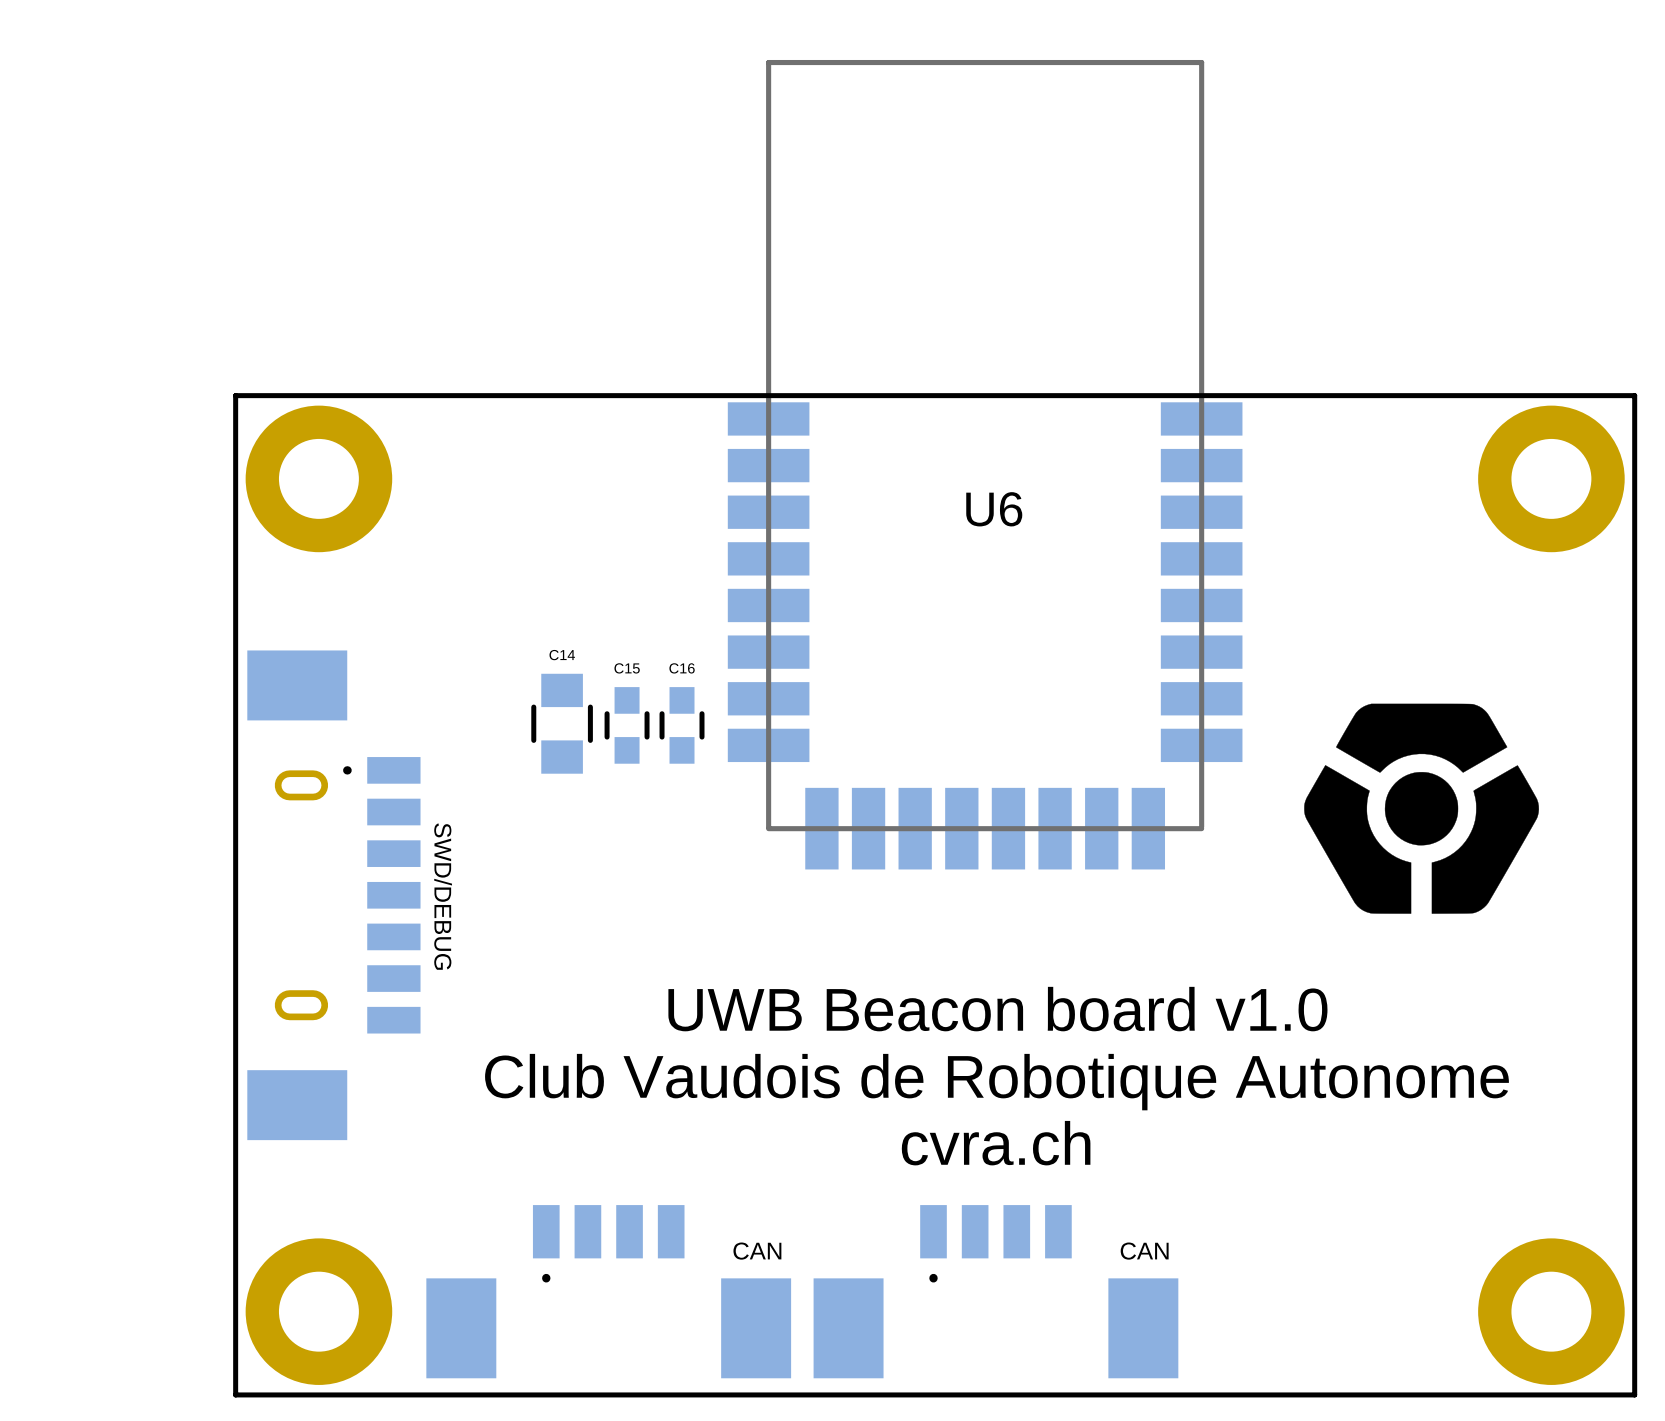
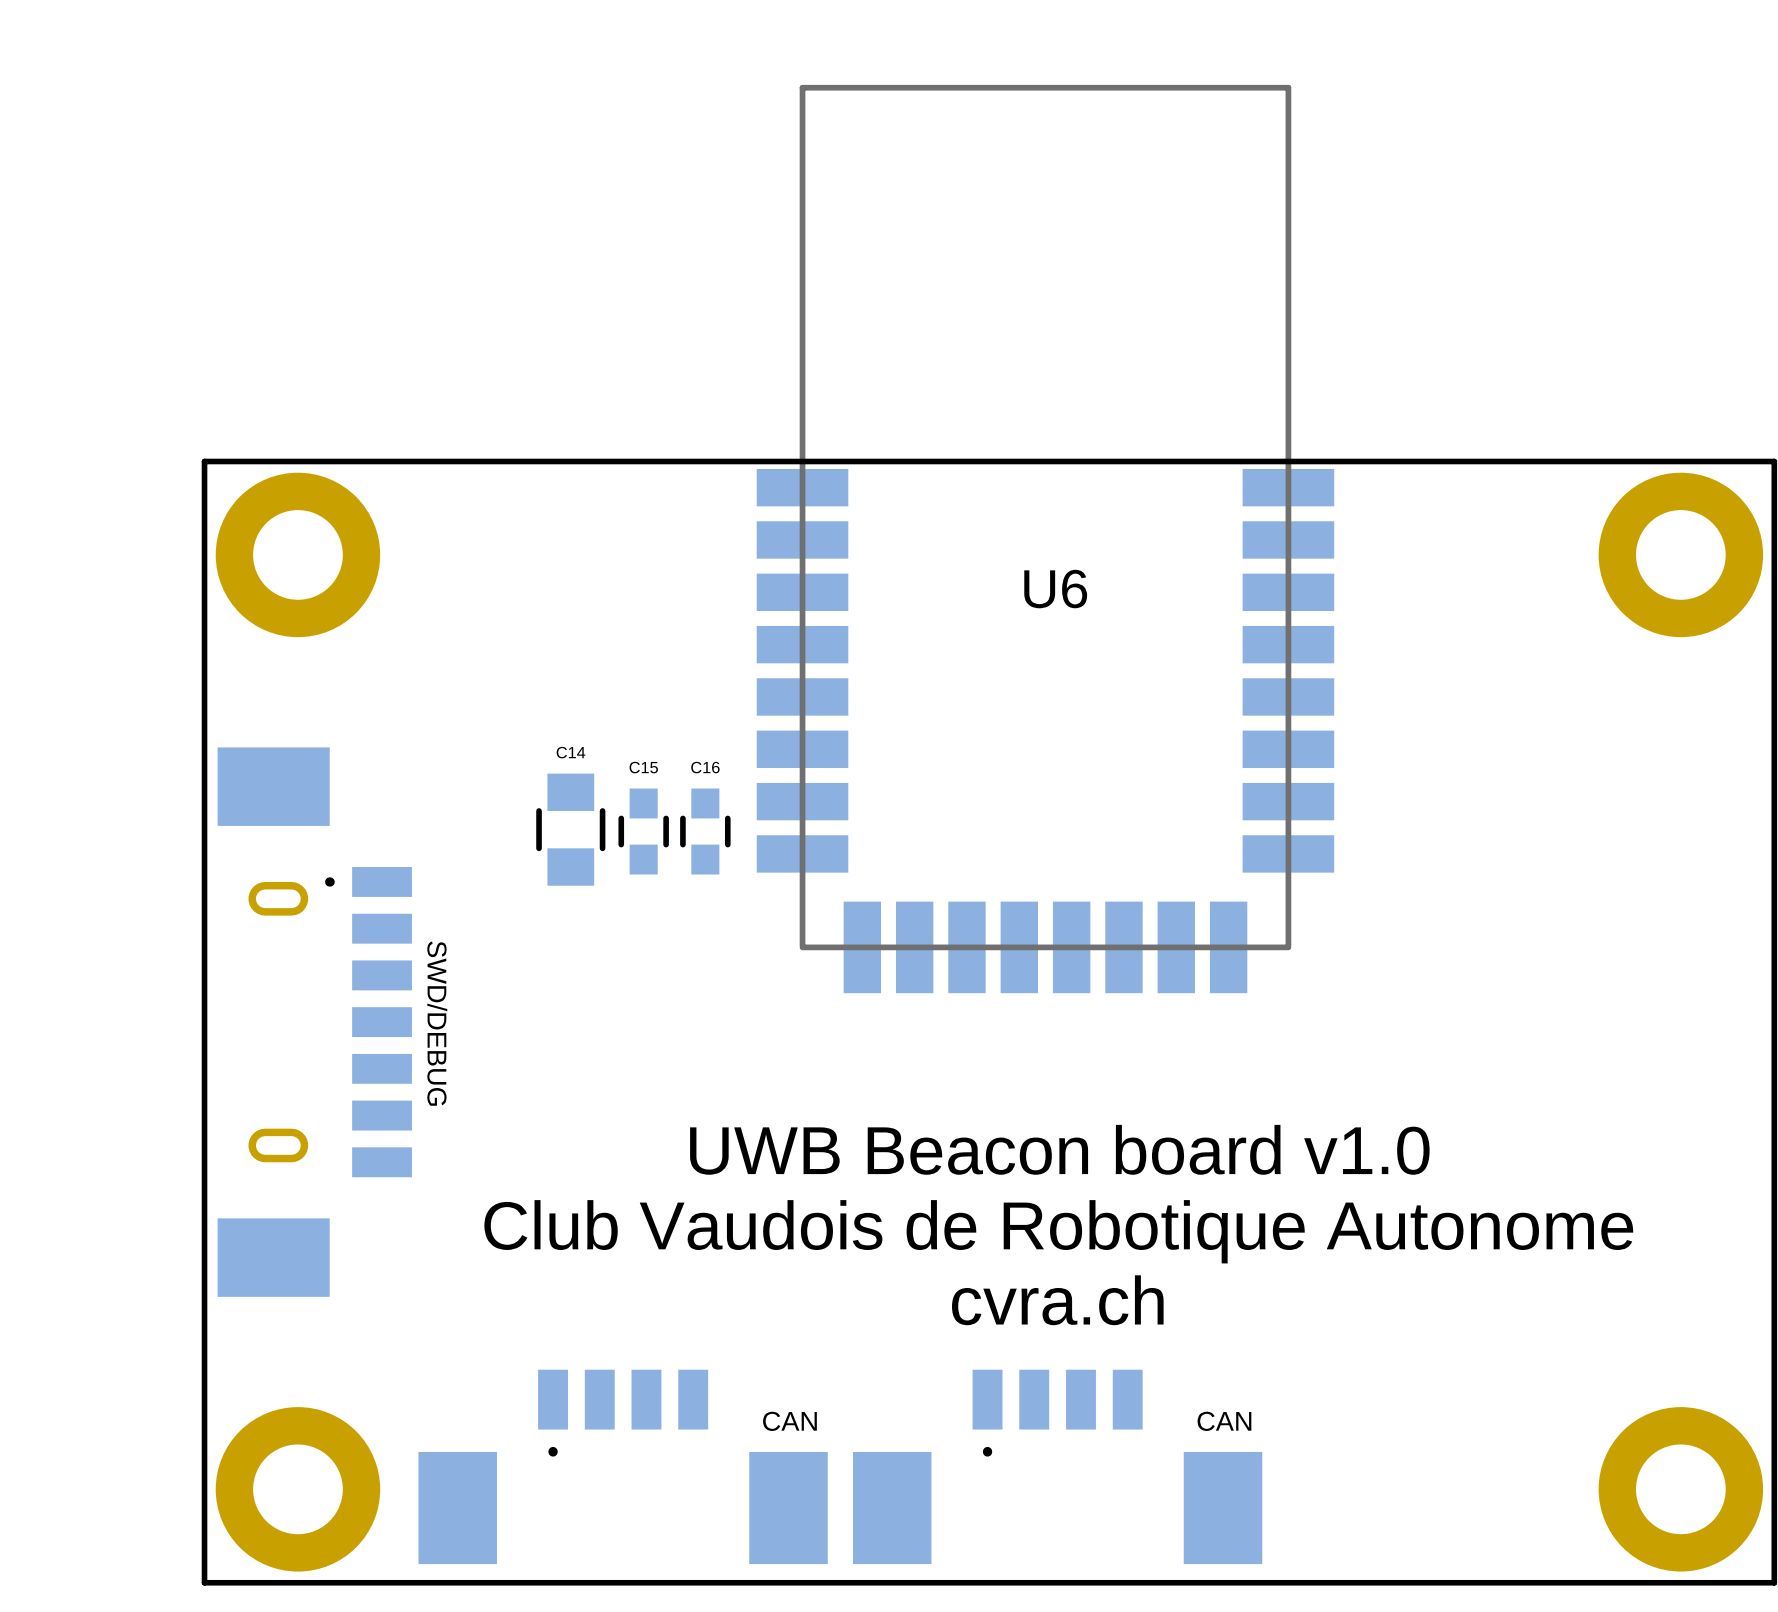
drawing: [1304, 703, 1540, 914] -> none

